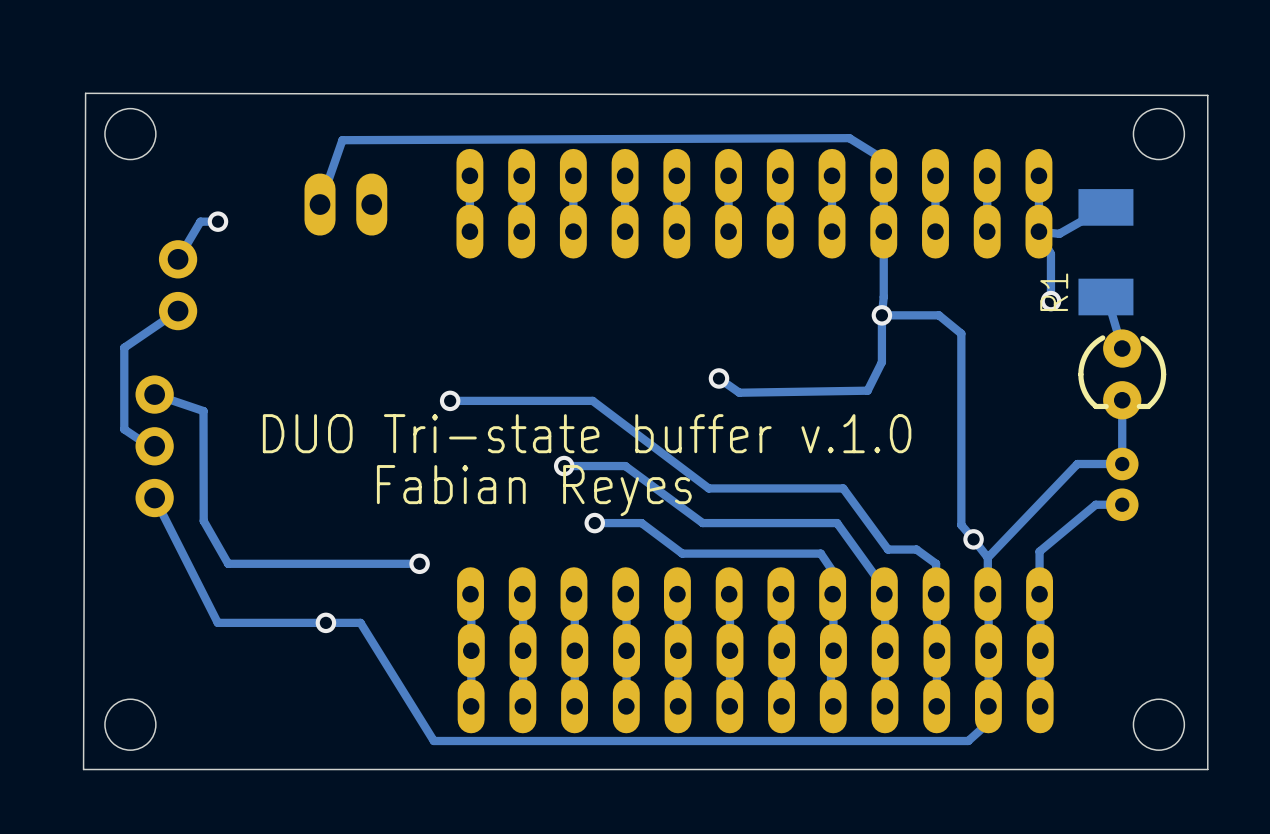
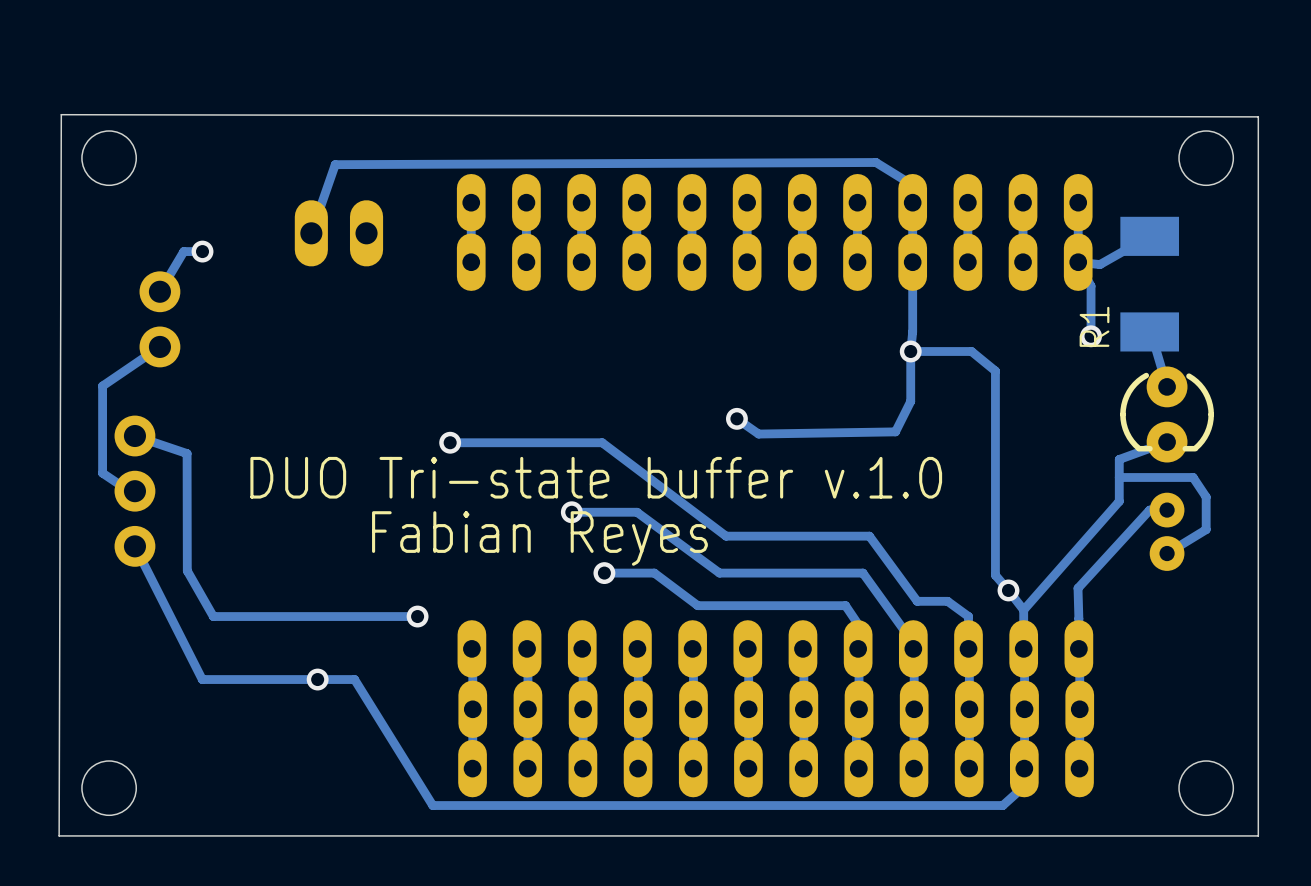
track: (1122, 400) (1122, 464) -> none
track: none -> (1119, 477) (1193, 477) (1206, 497) (1206, 529) (1167, 553)
track: (1105, 464) (1077, 464) (987, 557) -> (1167, 442) (1119, 459) (1119, 501) (1023, 610)
track: (1122, 504) (1095, 504) (1039, 551) (1039, 565) -> (1149, 510) (1078, 588) (1078, 618)

